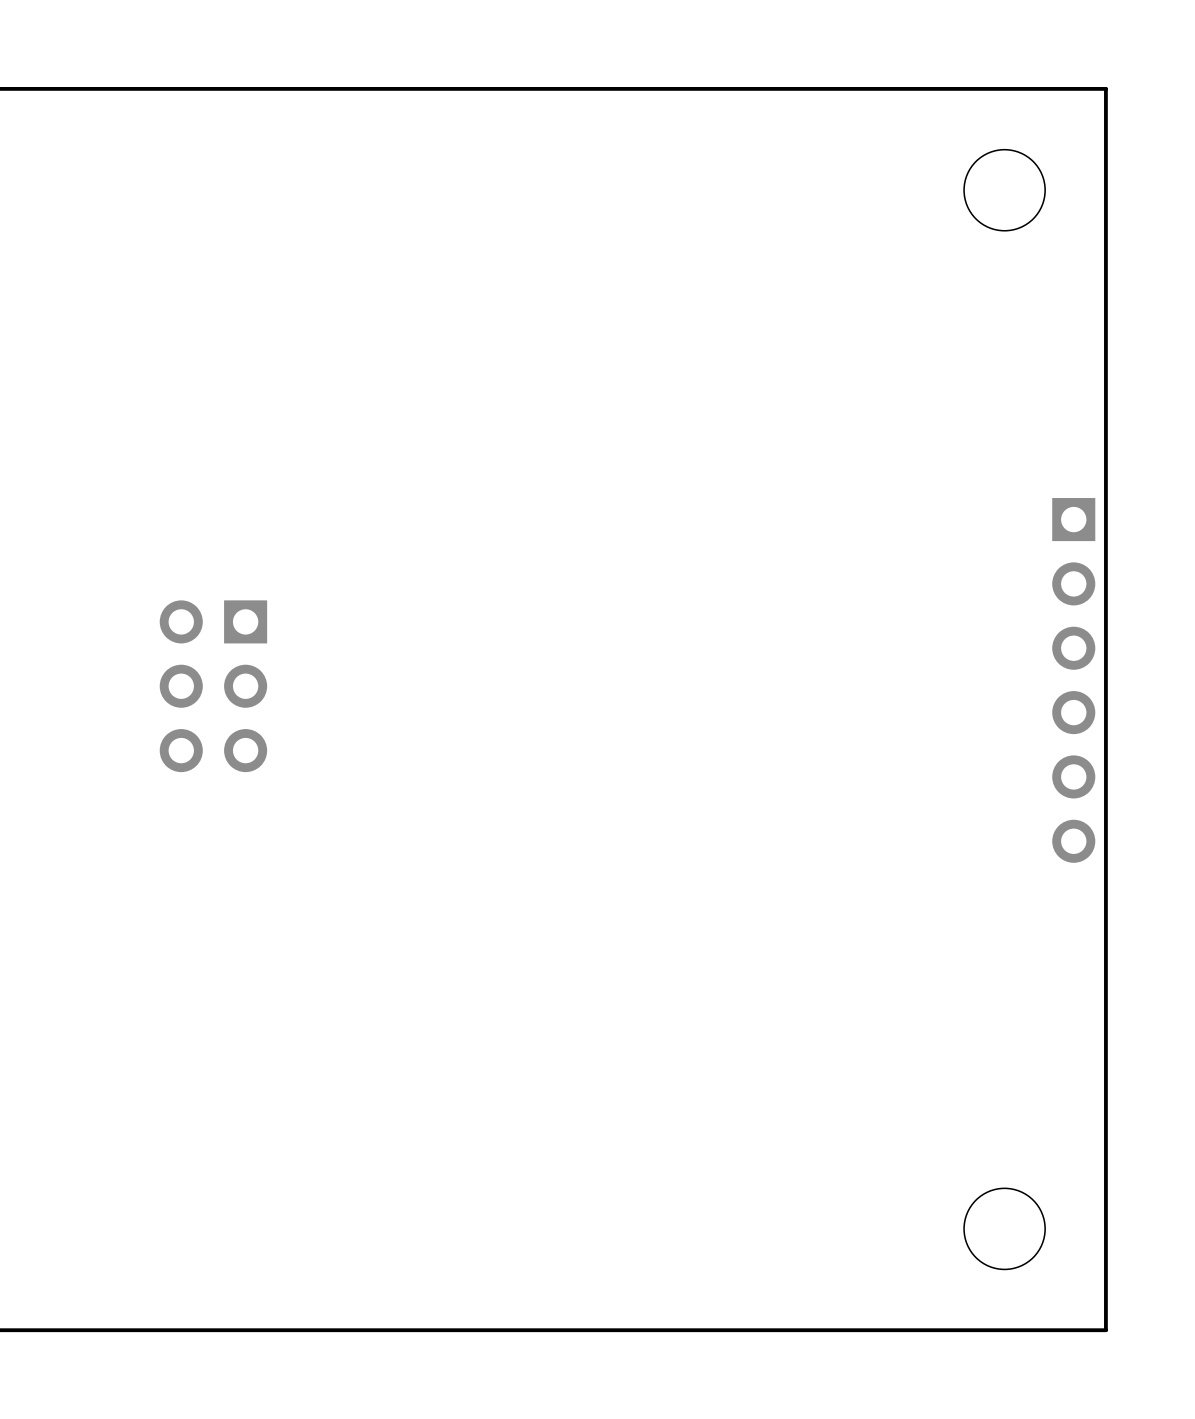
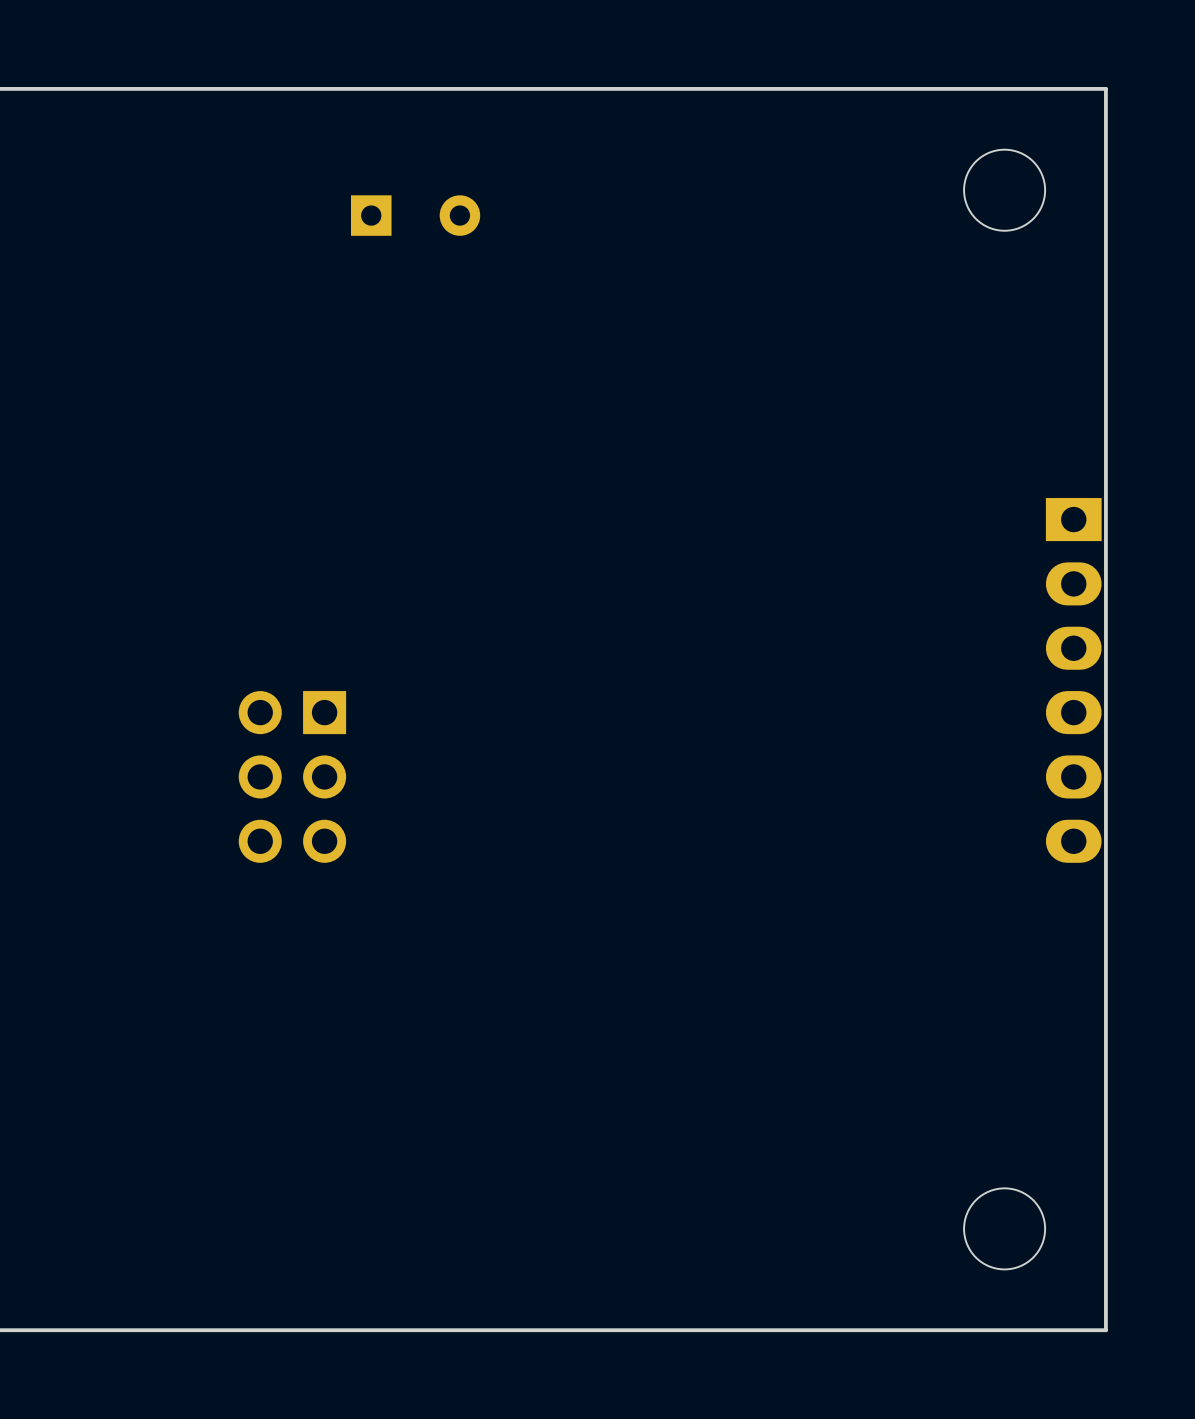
part: none -> (415, 215)
part footprint: [1052, 498, 1096, 863] -> [1045, 498, 1102, 863]
part position: (213, 686) -> (292, 776)

